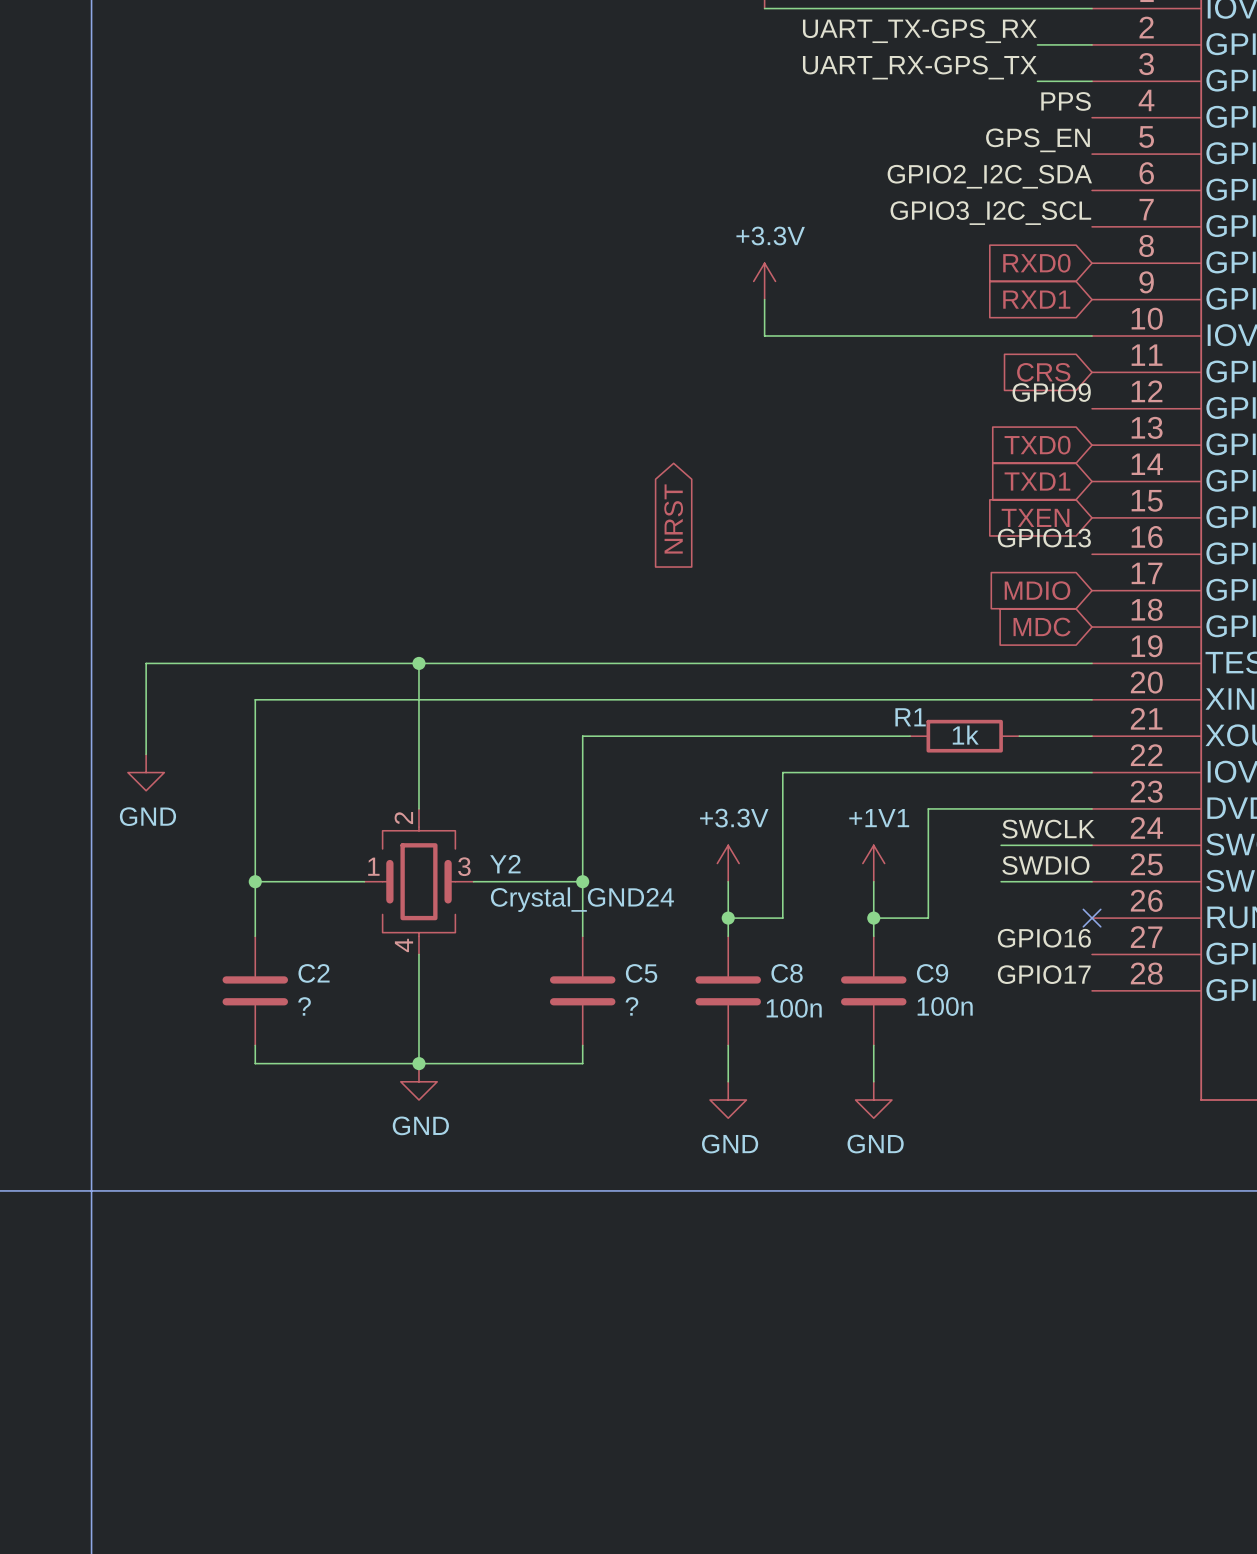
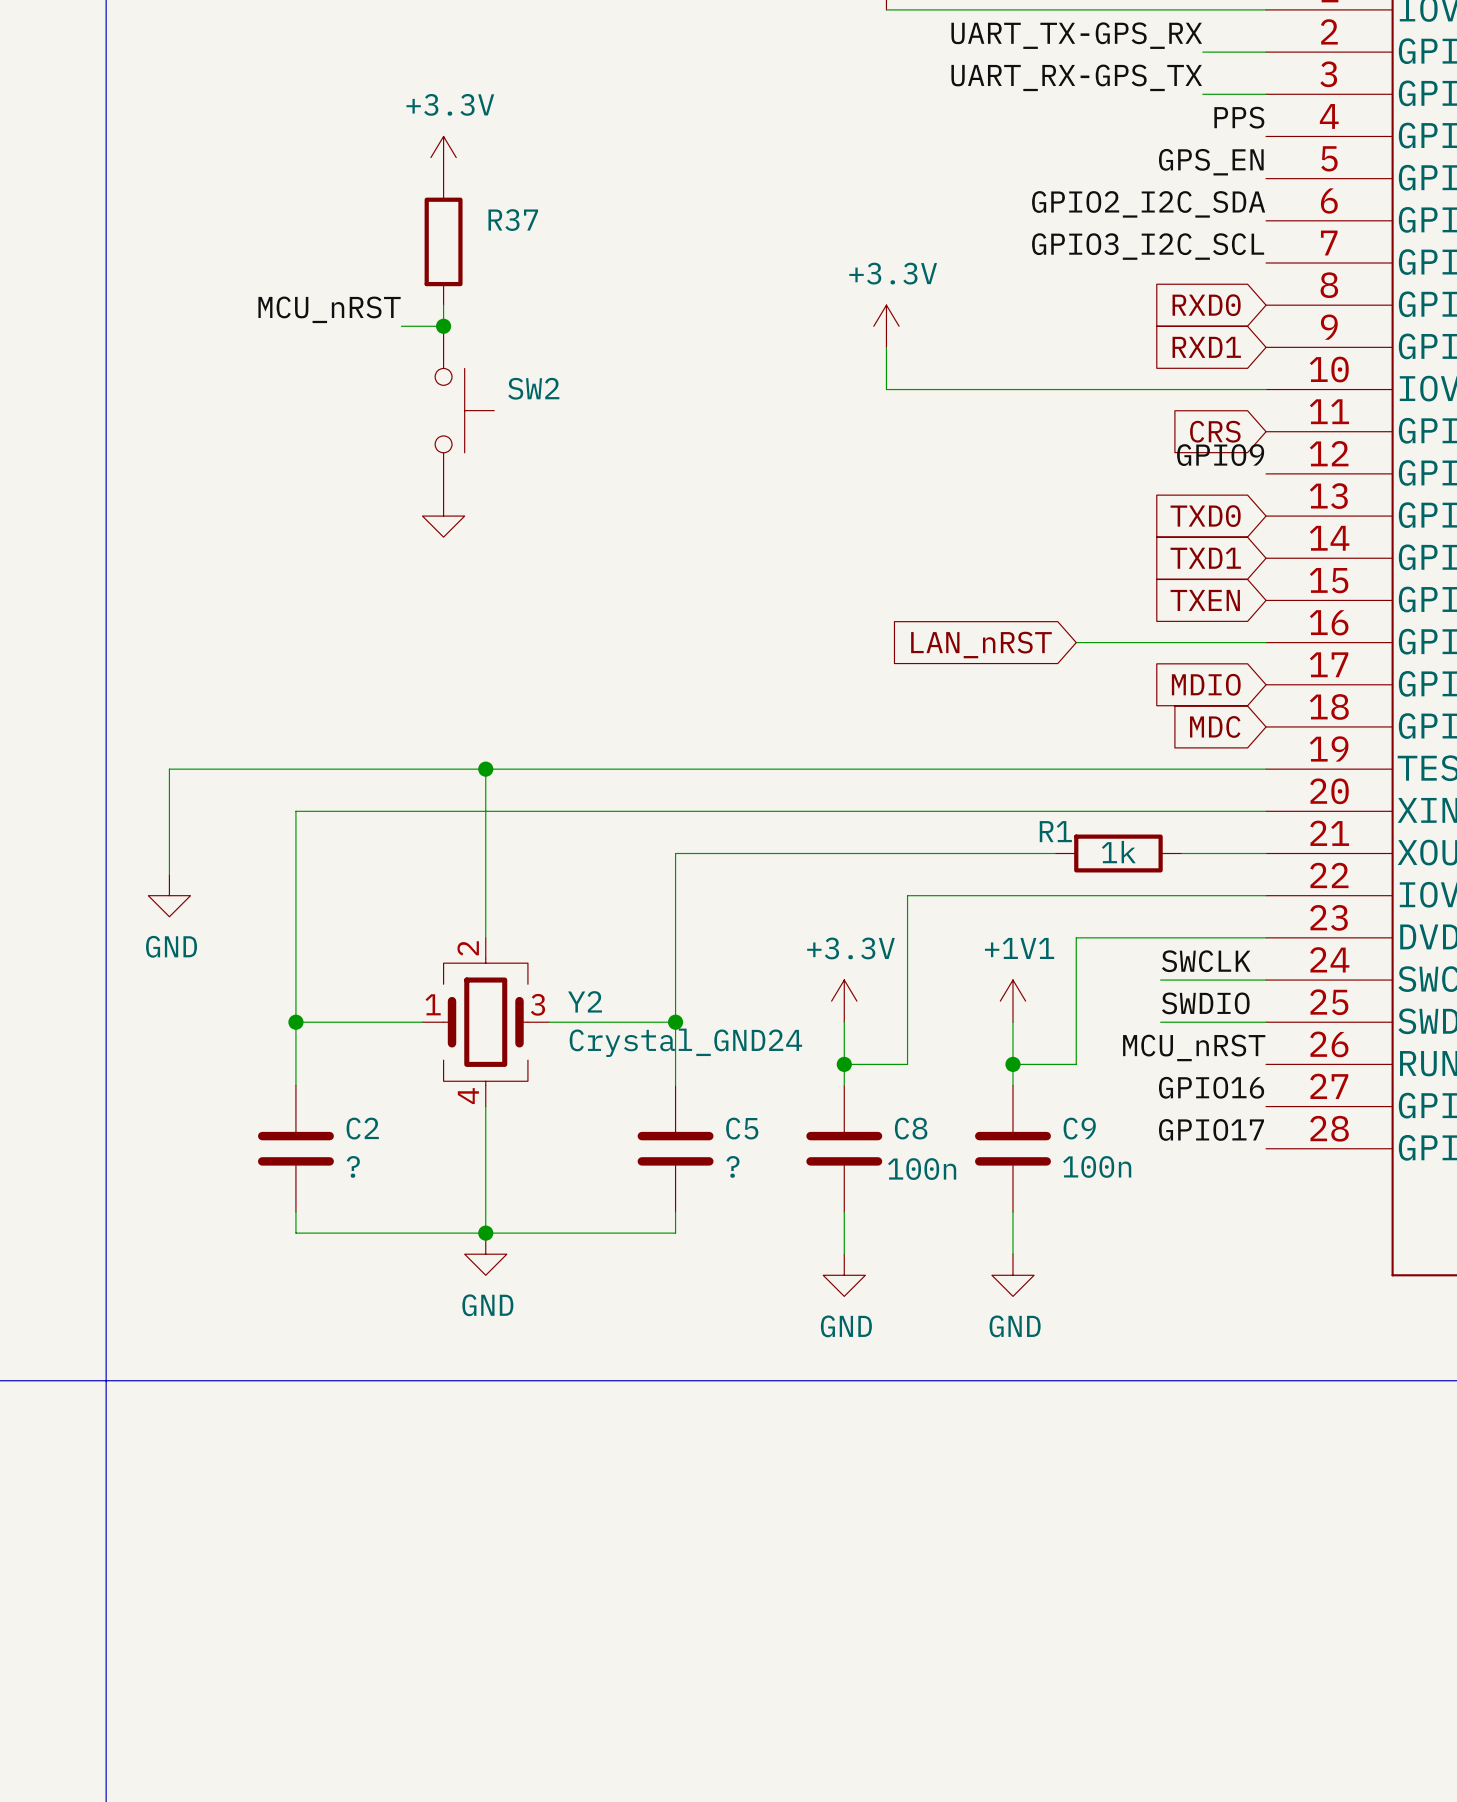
power symbol: none -> +3.3V (443, 157)
R37: none -> (443, 241)
wire: none -> (443, 305) (443, 326) (401, 326)
label: none -> MCU_nRST (329, 309)
junction: none -> (443, 326)
SW2: none -> (464, 410)
power symbol: none -> (443, 516)
global label: NRST (673, 519) -> none
label: GPIO13 (1044, 538) -> none
wire: none -> (1076, 642) (1266, 642)
global label: none -> LAN_nRST (981, 644)
label: none -> MCU_nRST (1194, 1047)
no-connect mark: (1092, 918) -> none

